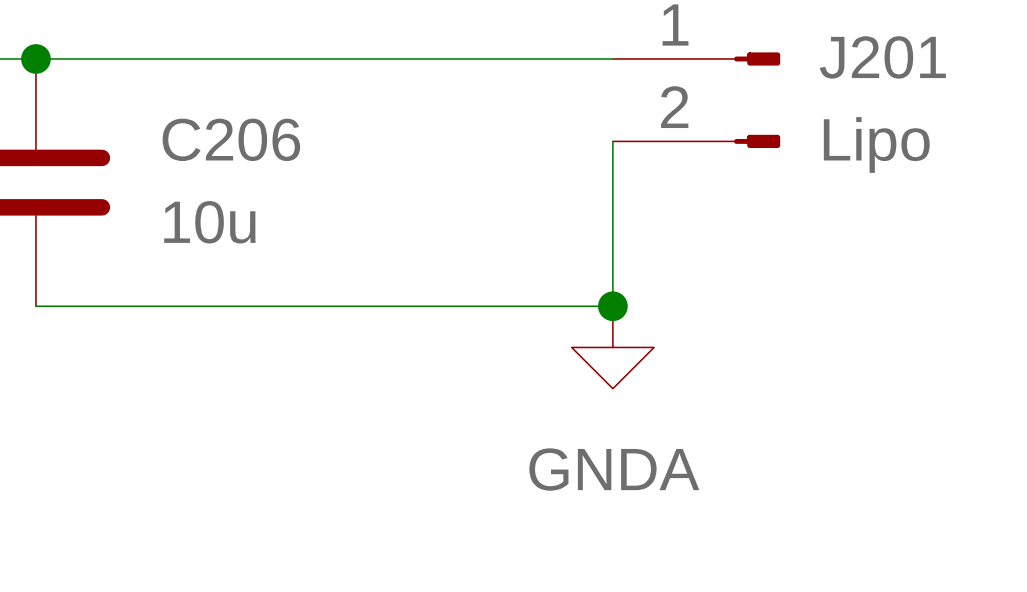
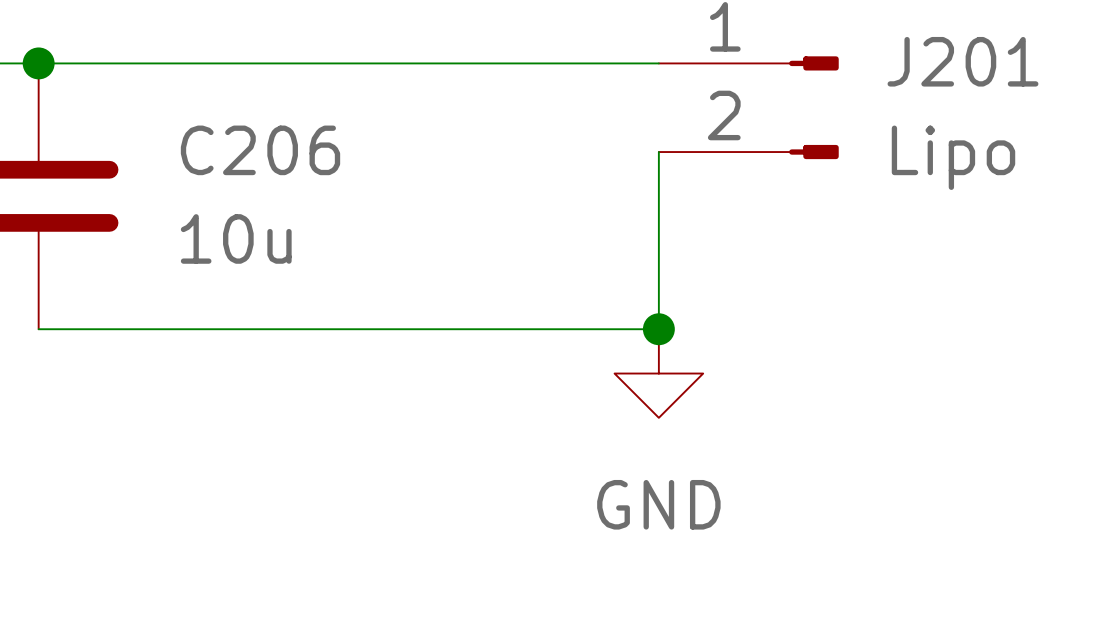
power symbol: GNDA (612, 347) -> GND (658, 373)

